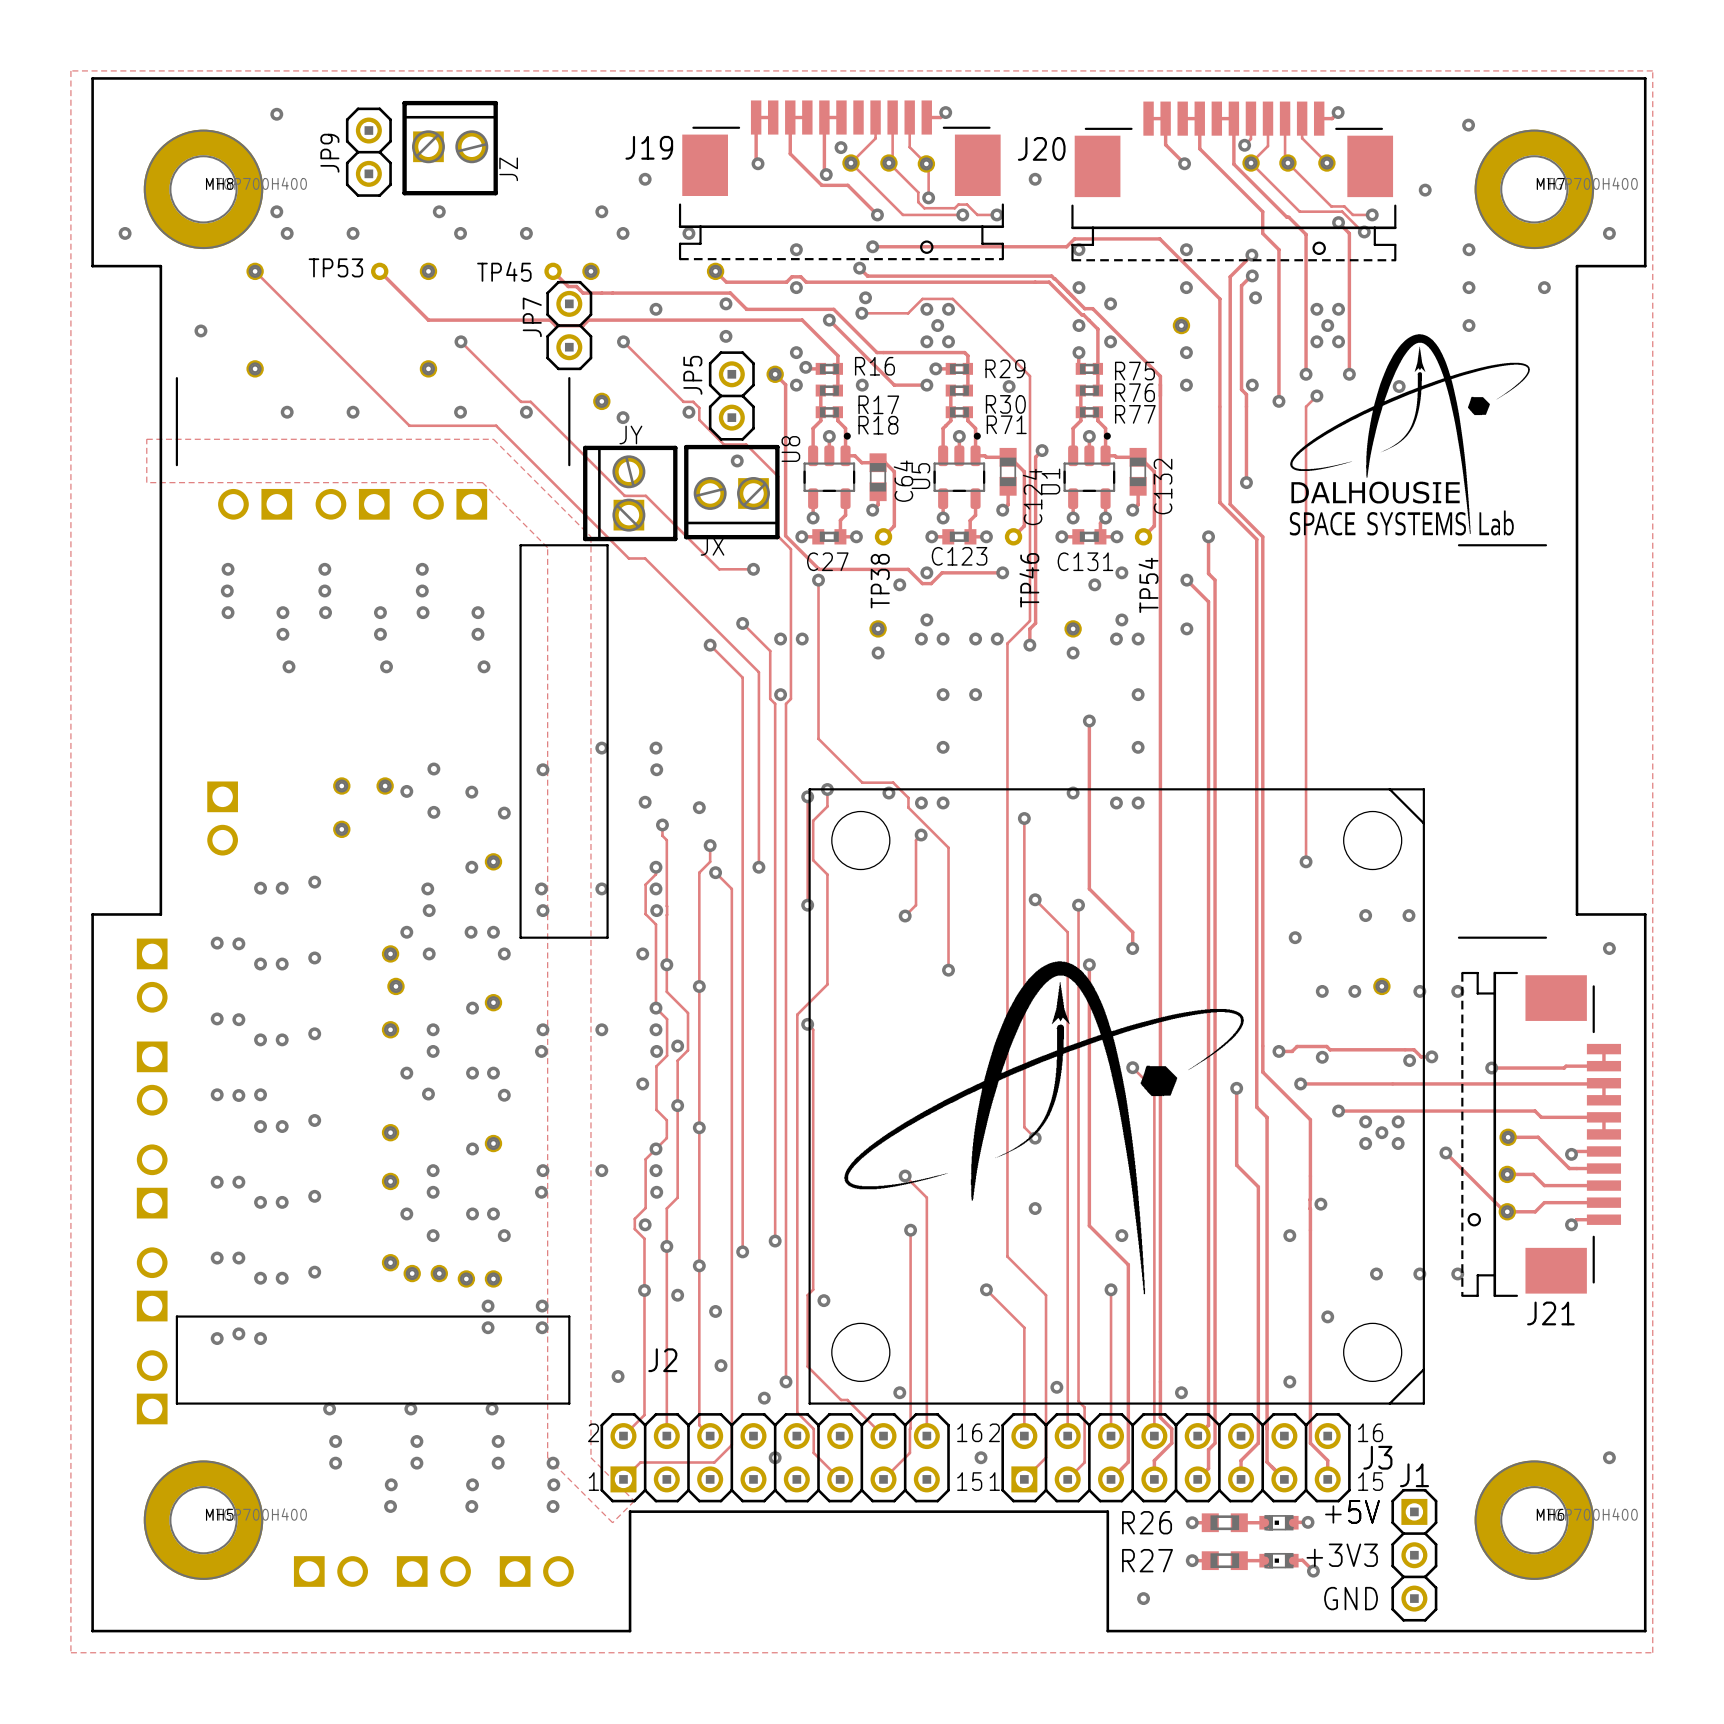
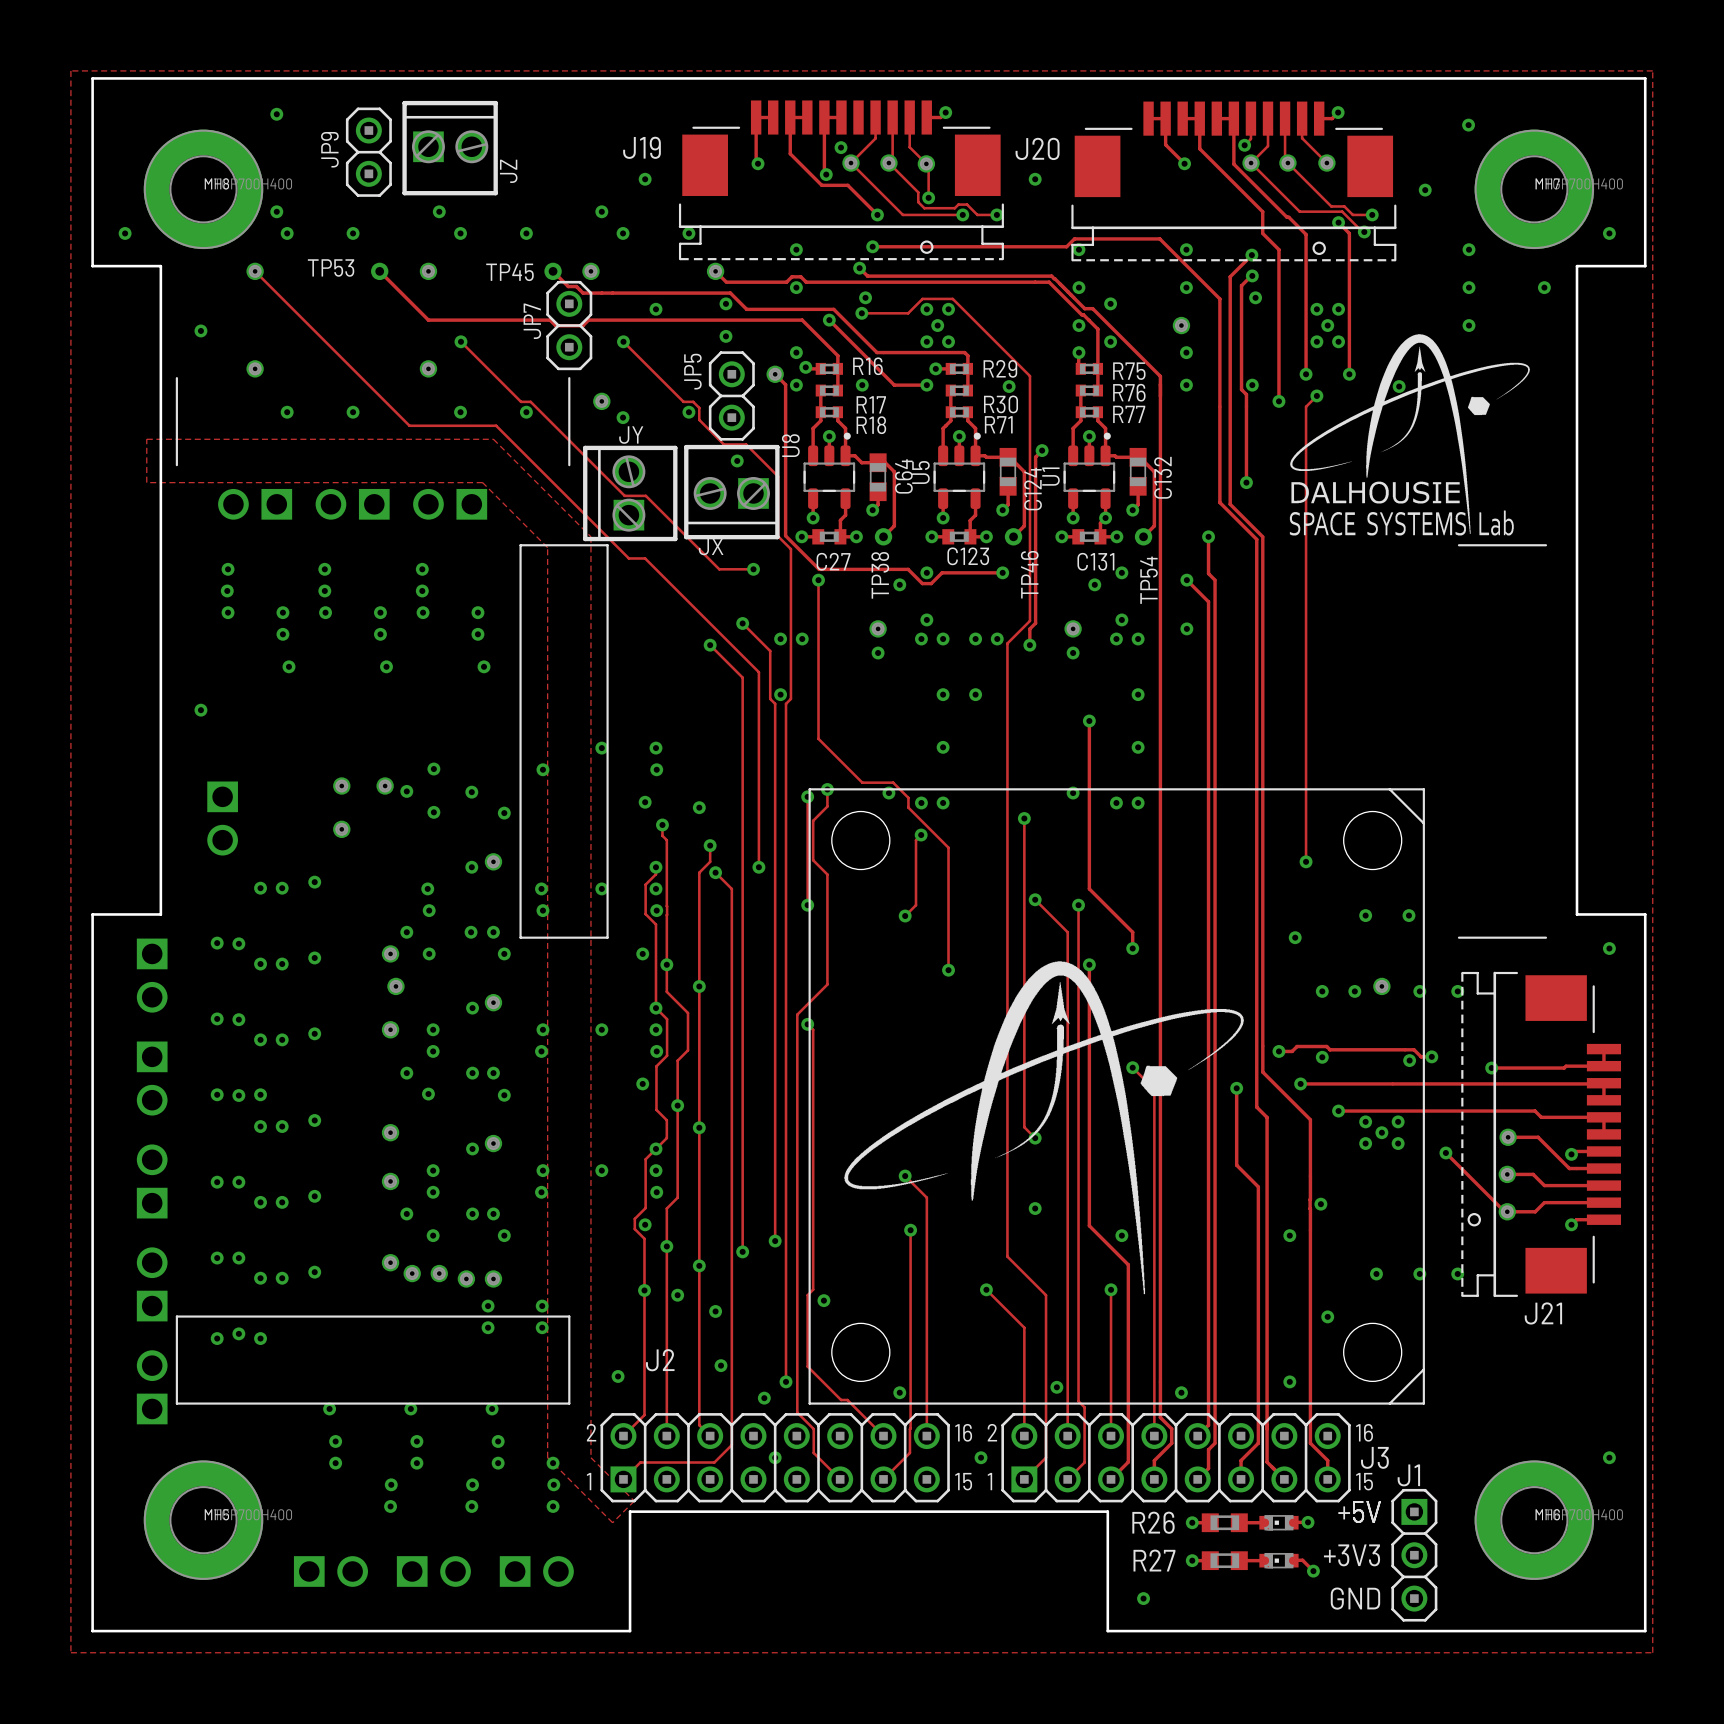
via: none -> (200, 710)
via: (677, 1046) -> none

